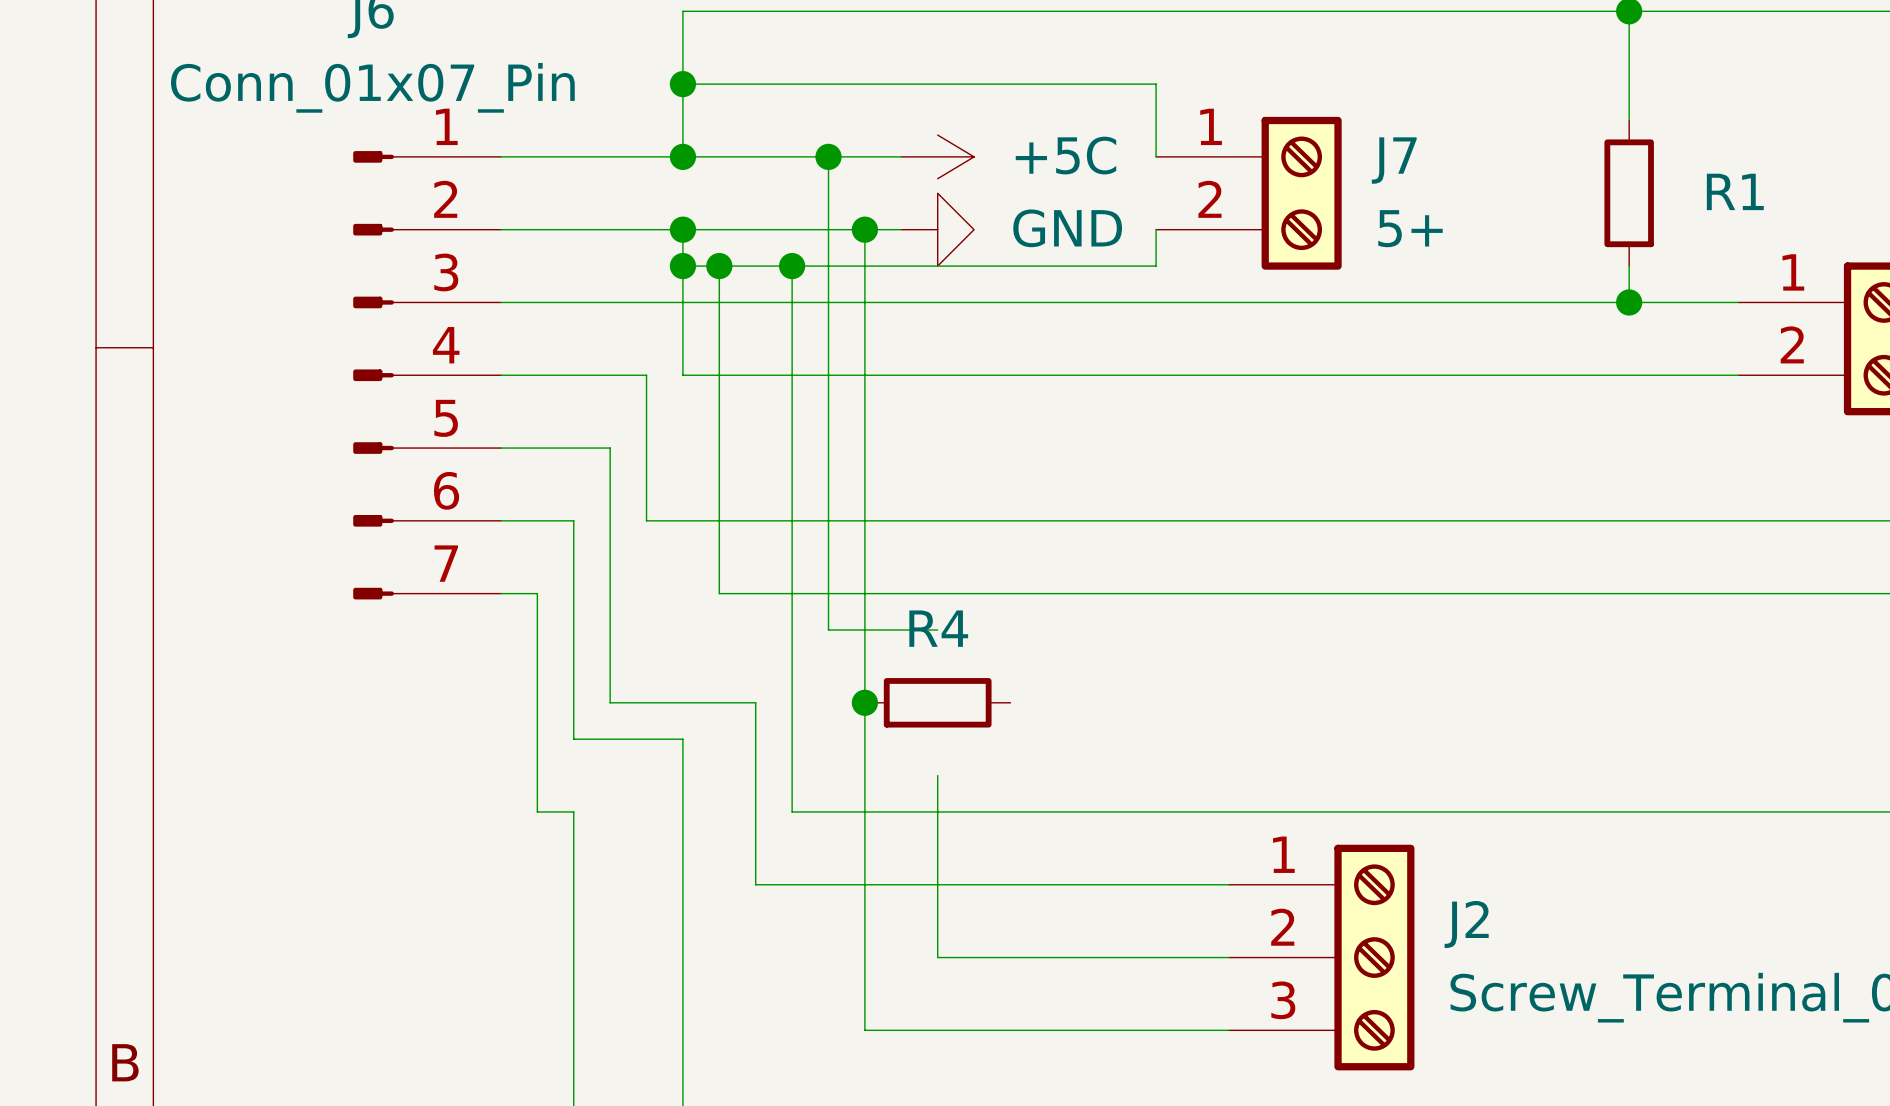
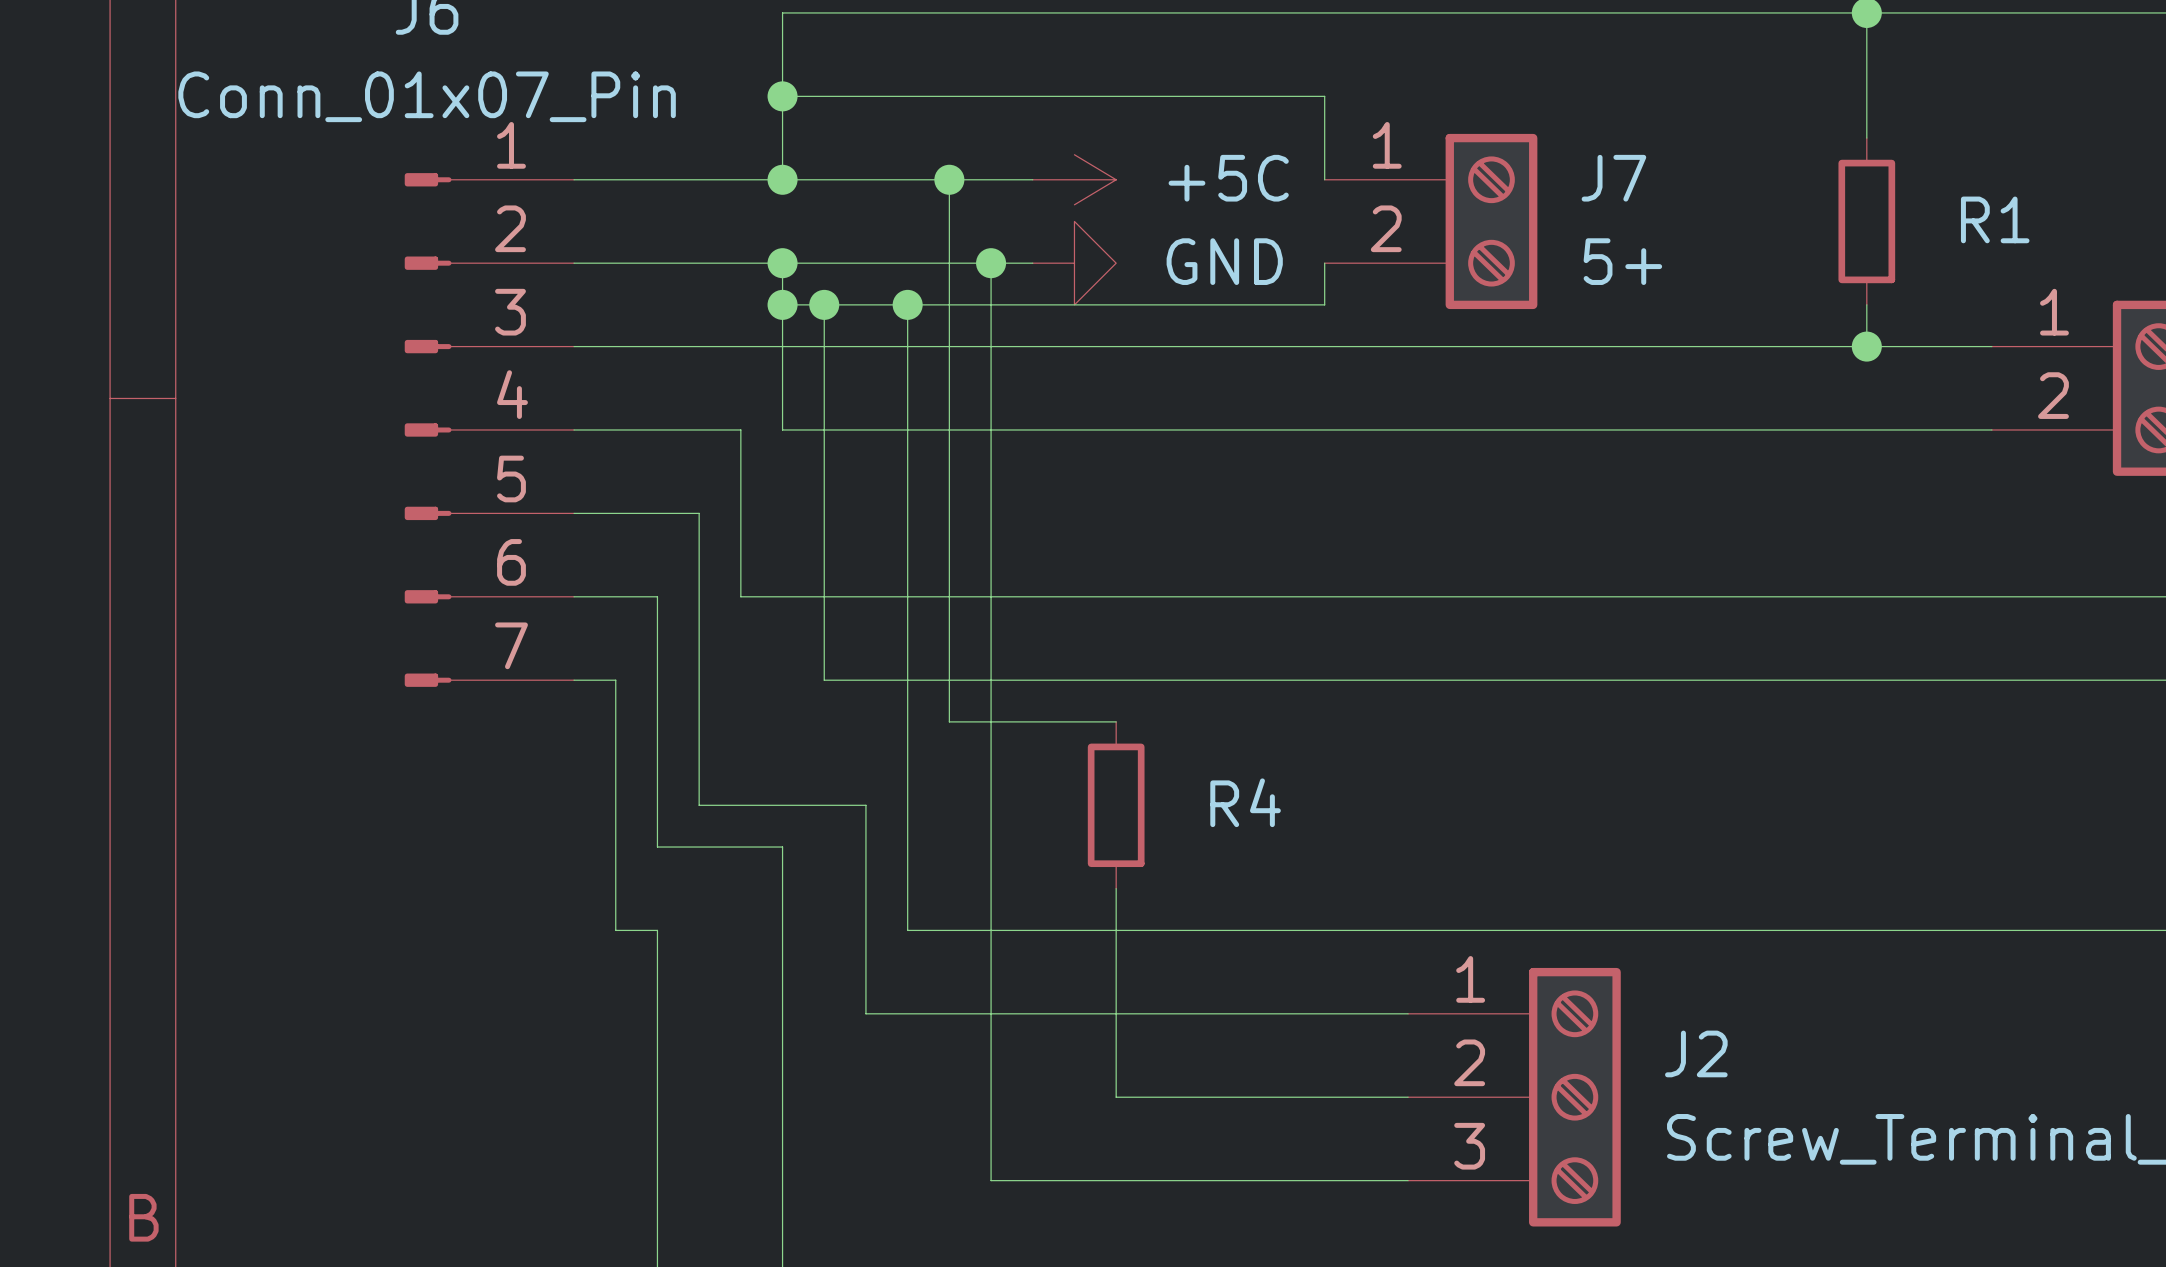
wire: none -> (1074, 721) (1116, 721)
junction: (864, 702) -> none
R4 rotation: 0° (937, 702) -> 90° clockwise (1116, 805)
wire: (937, 775) (937, 957) (974, 957) -> (1116, 888) (1116, 1097)

